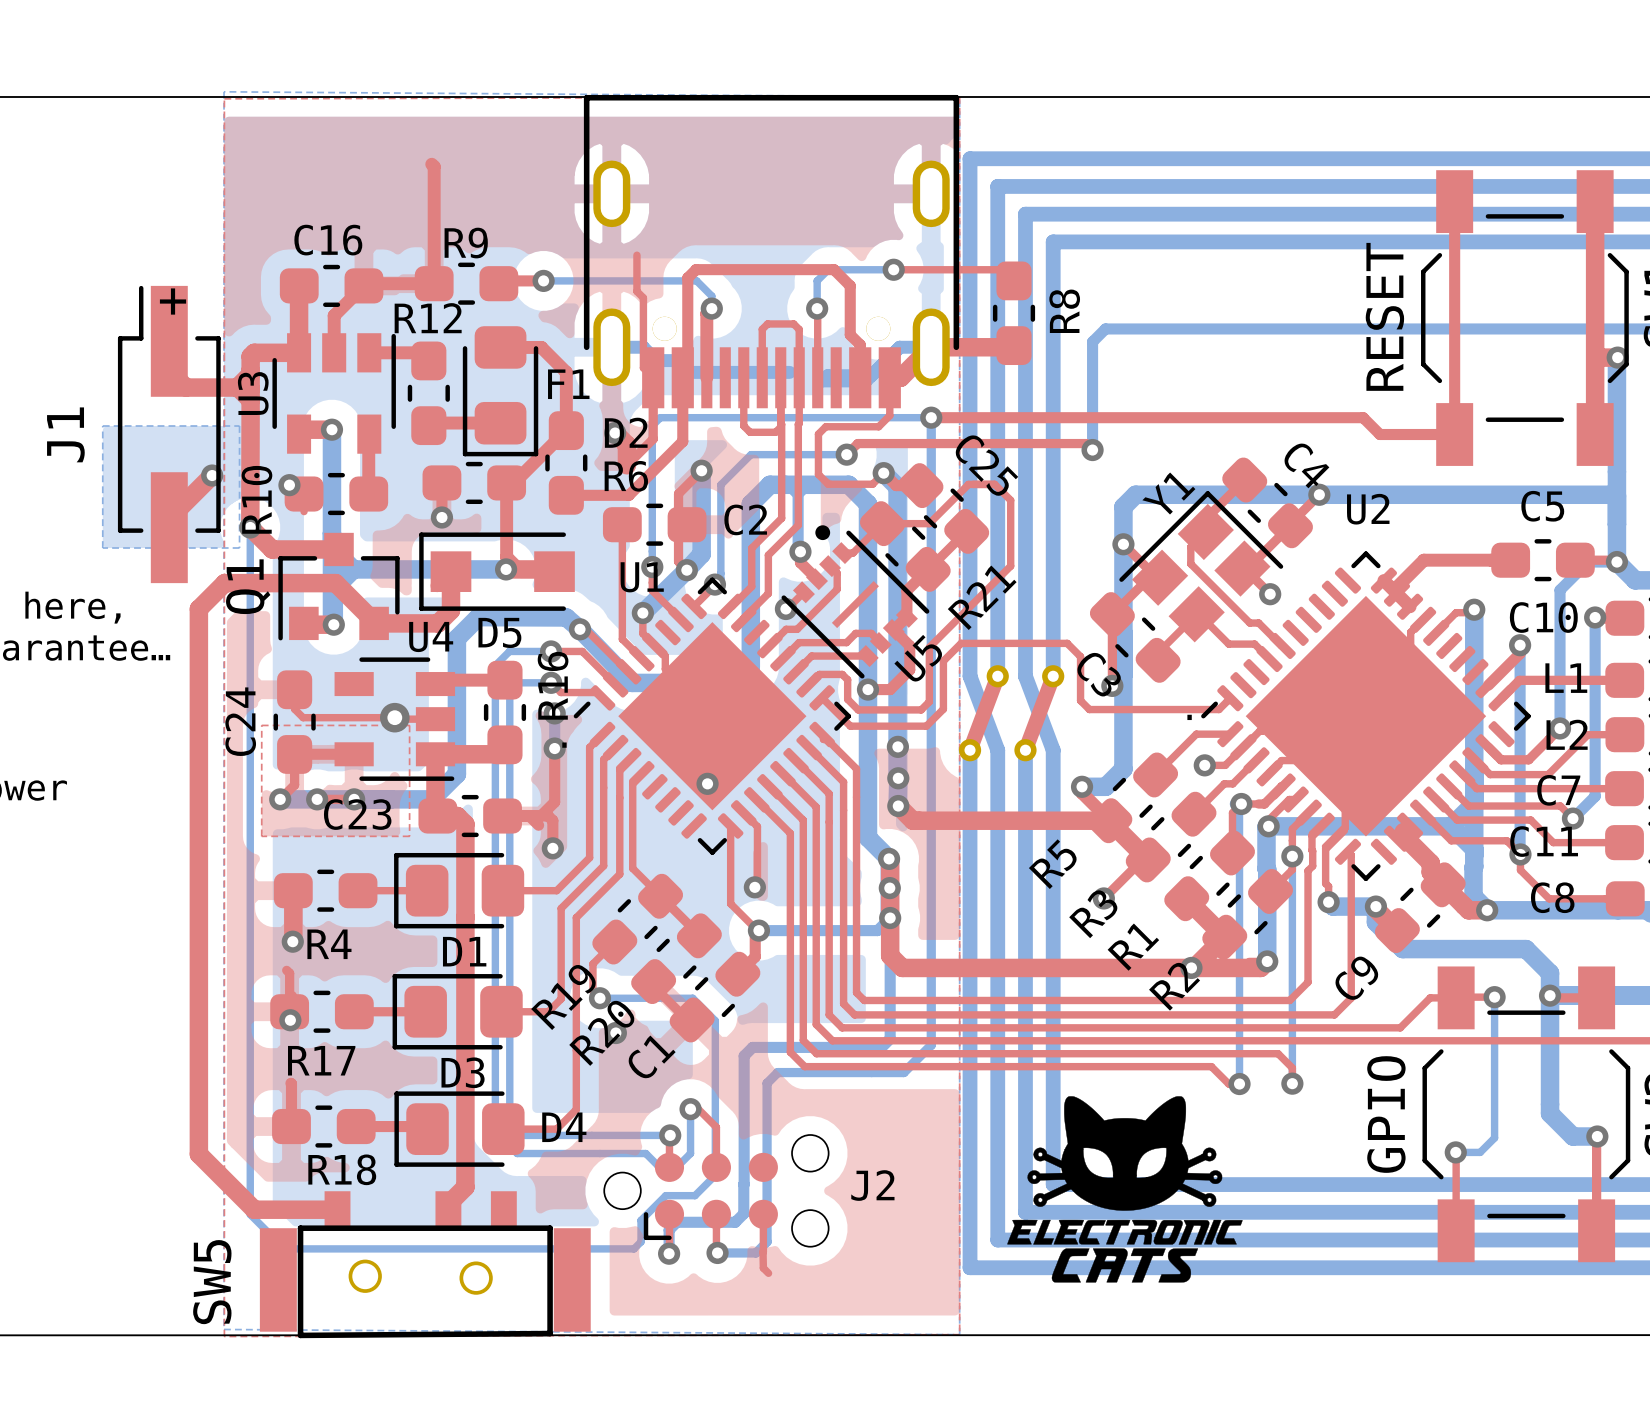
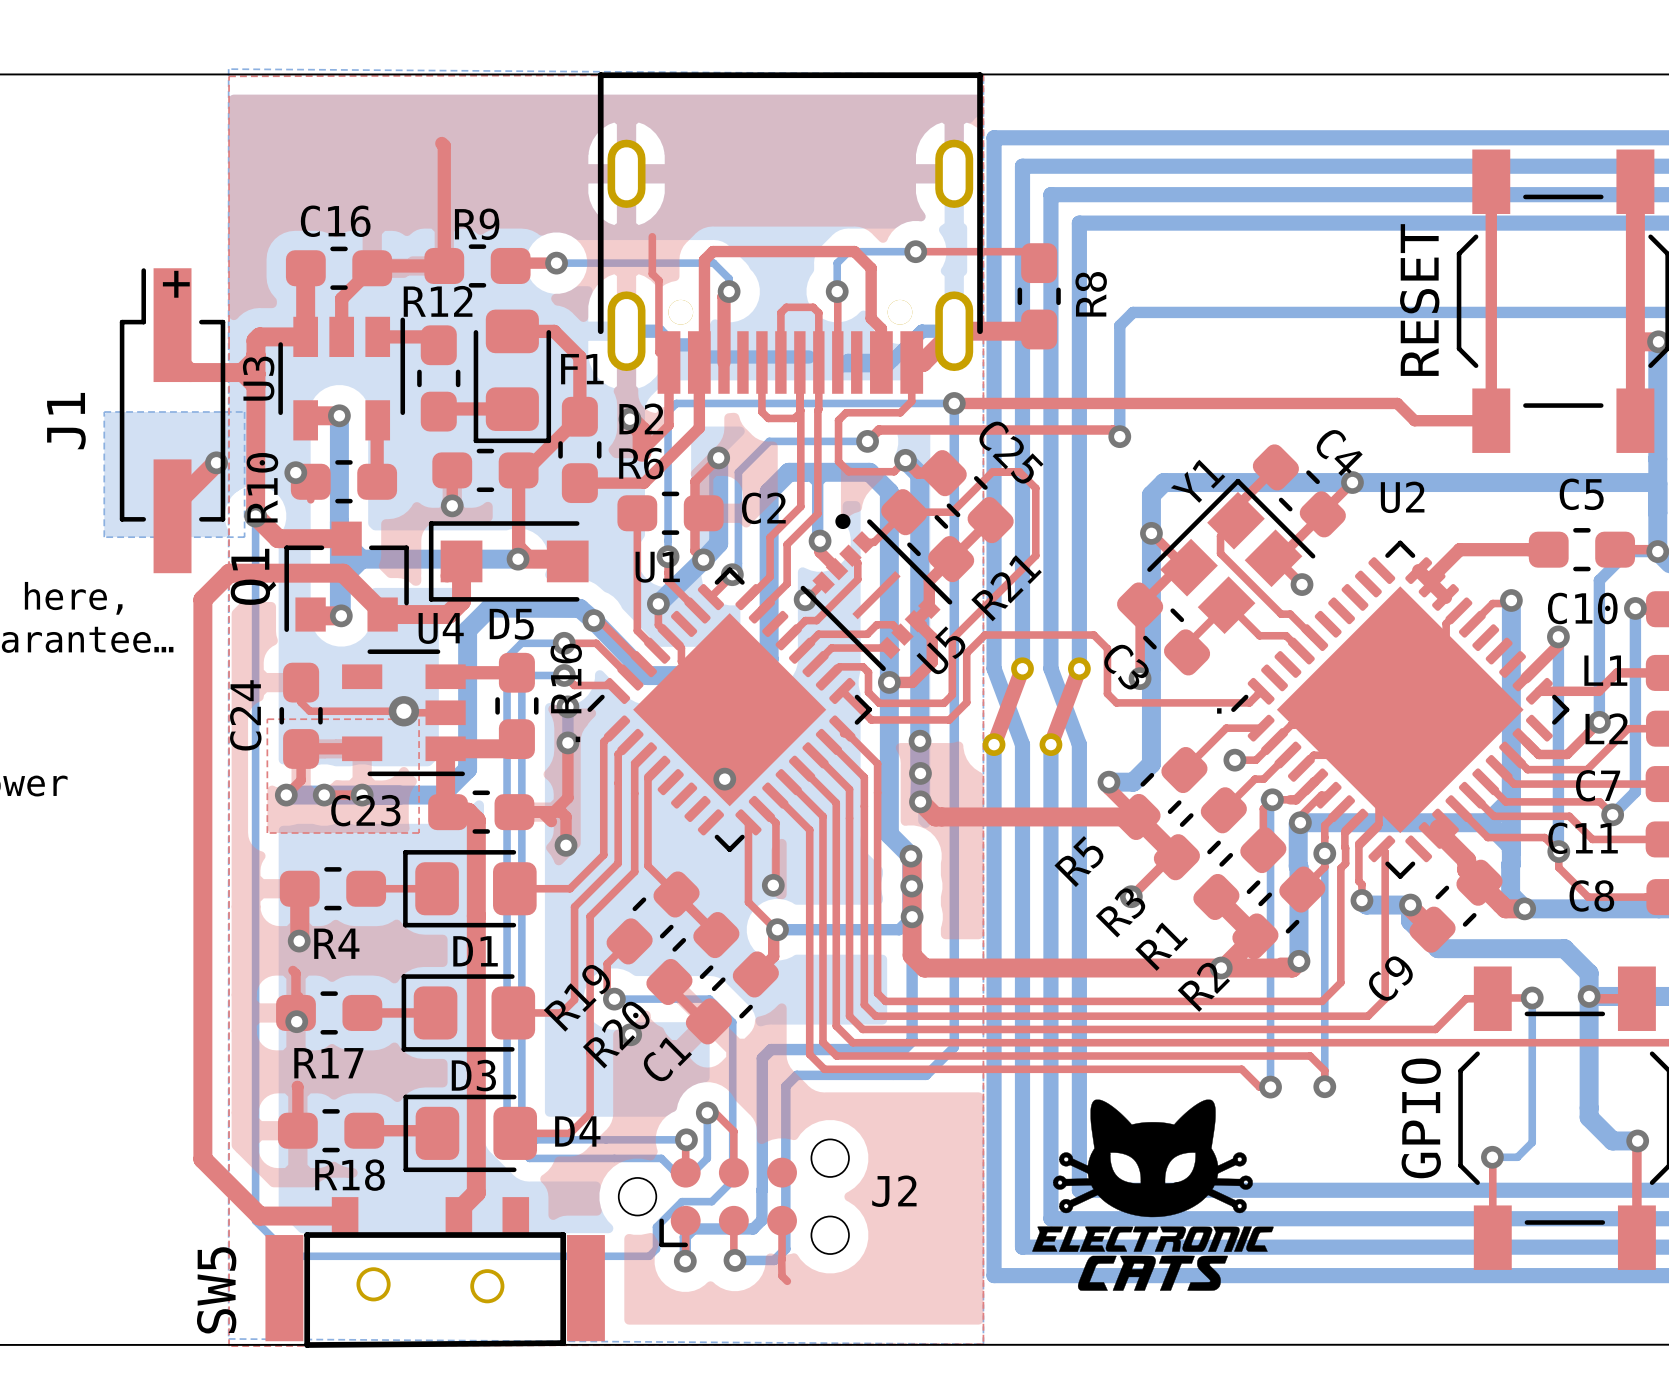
top track: (1577, 680) (1519, 680) (1501, 698) -> (1617, 672) (1598, 691) (1539, 691)

